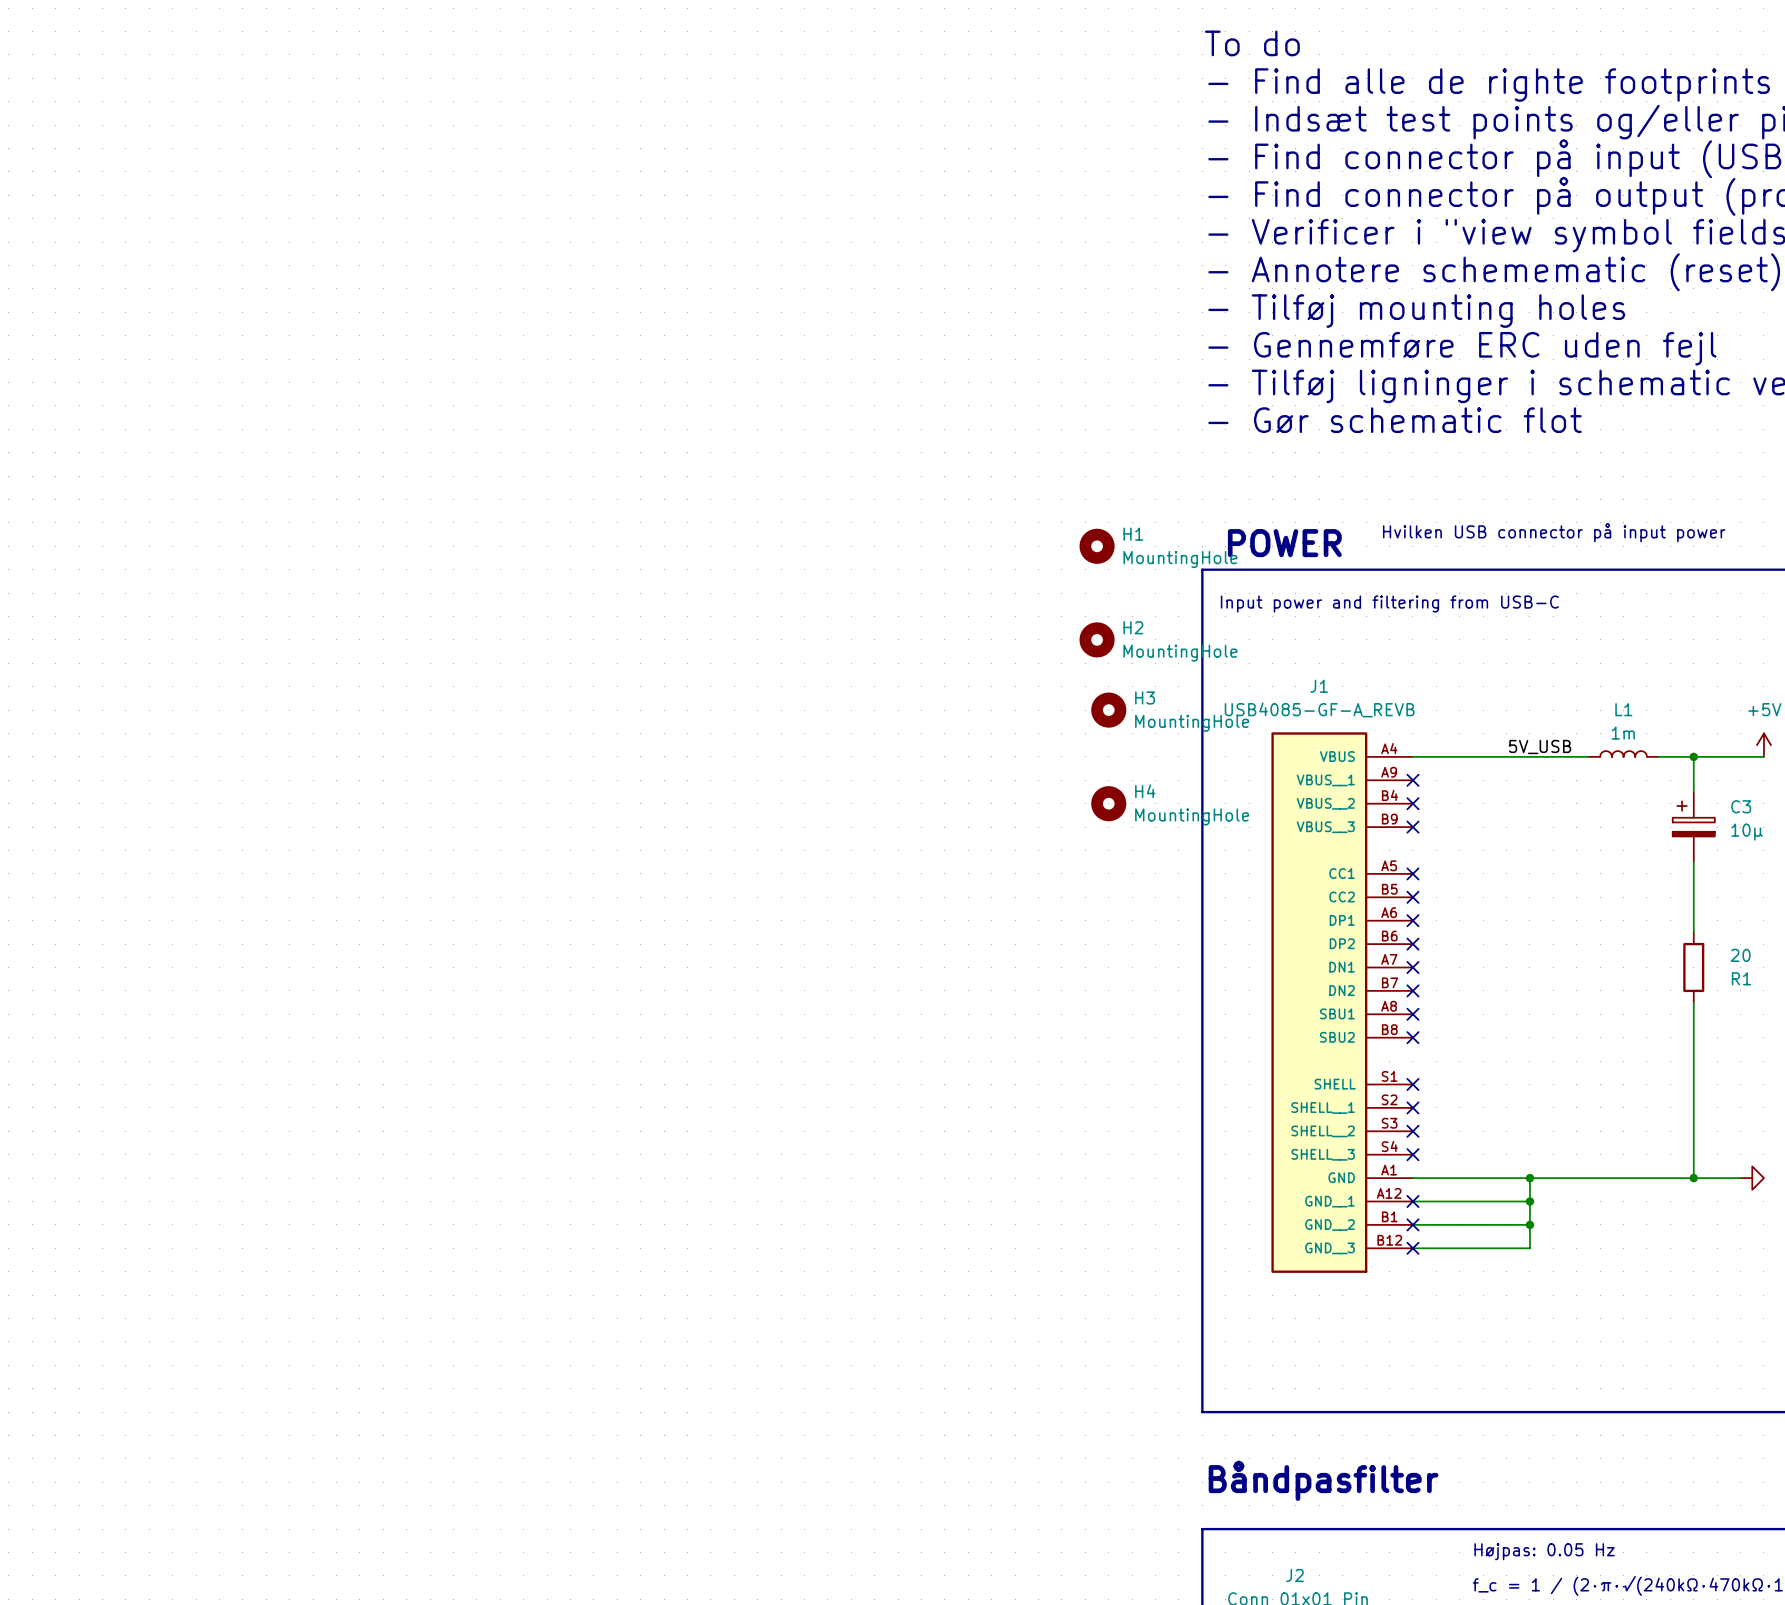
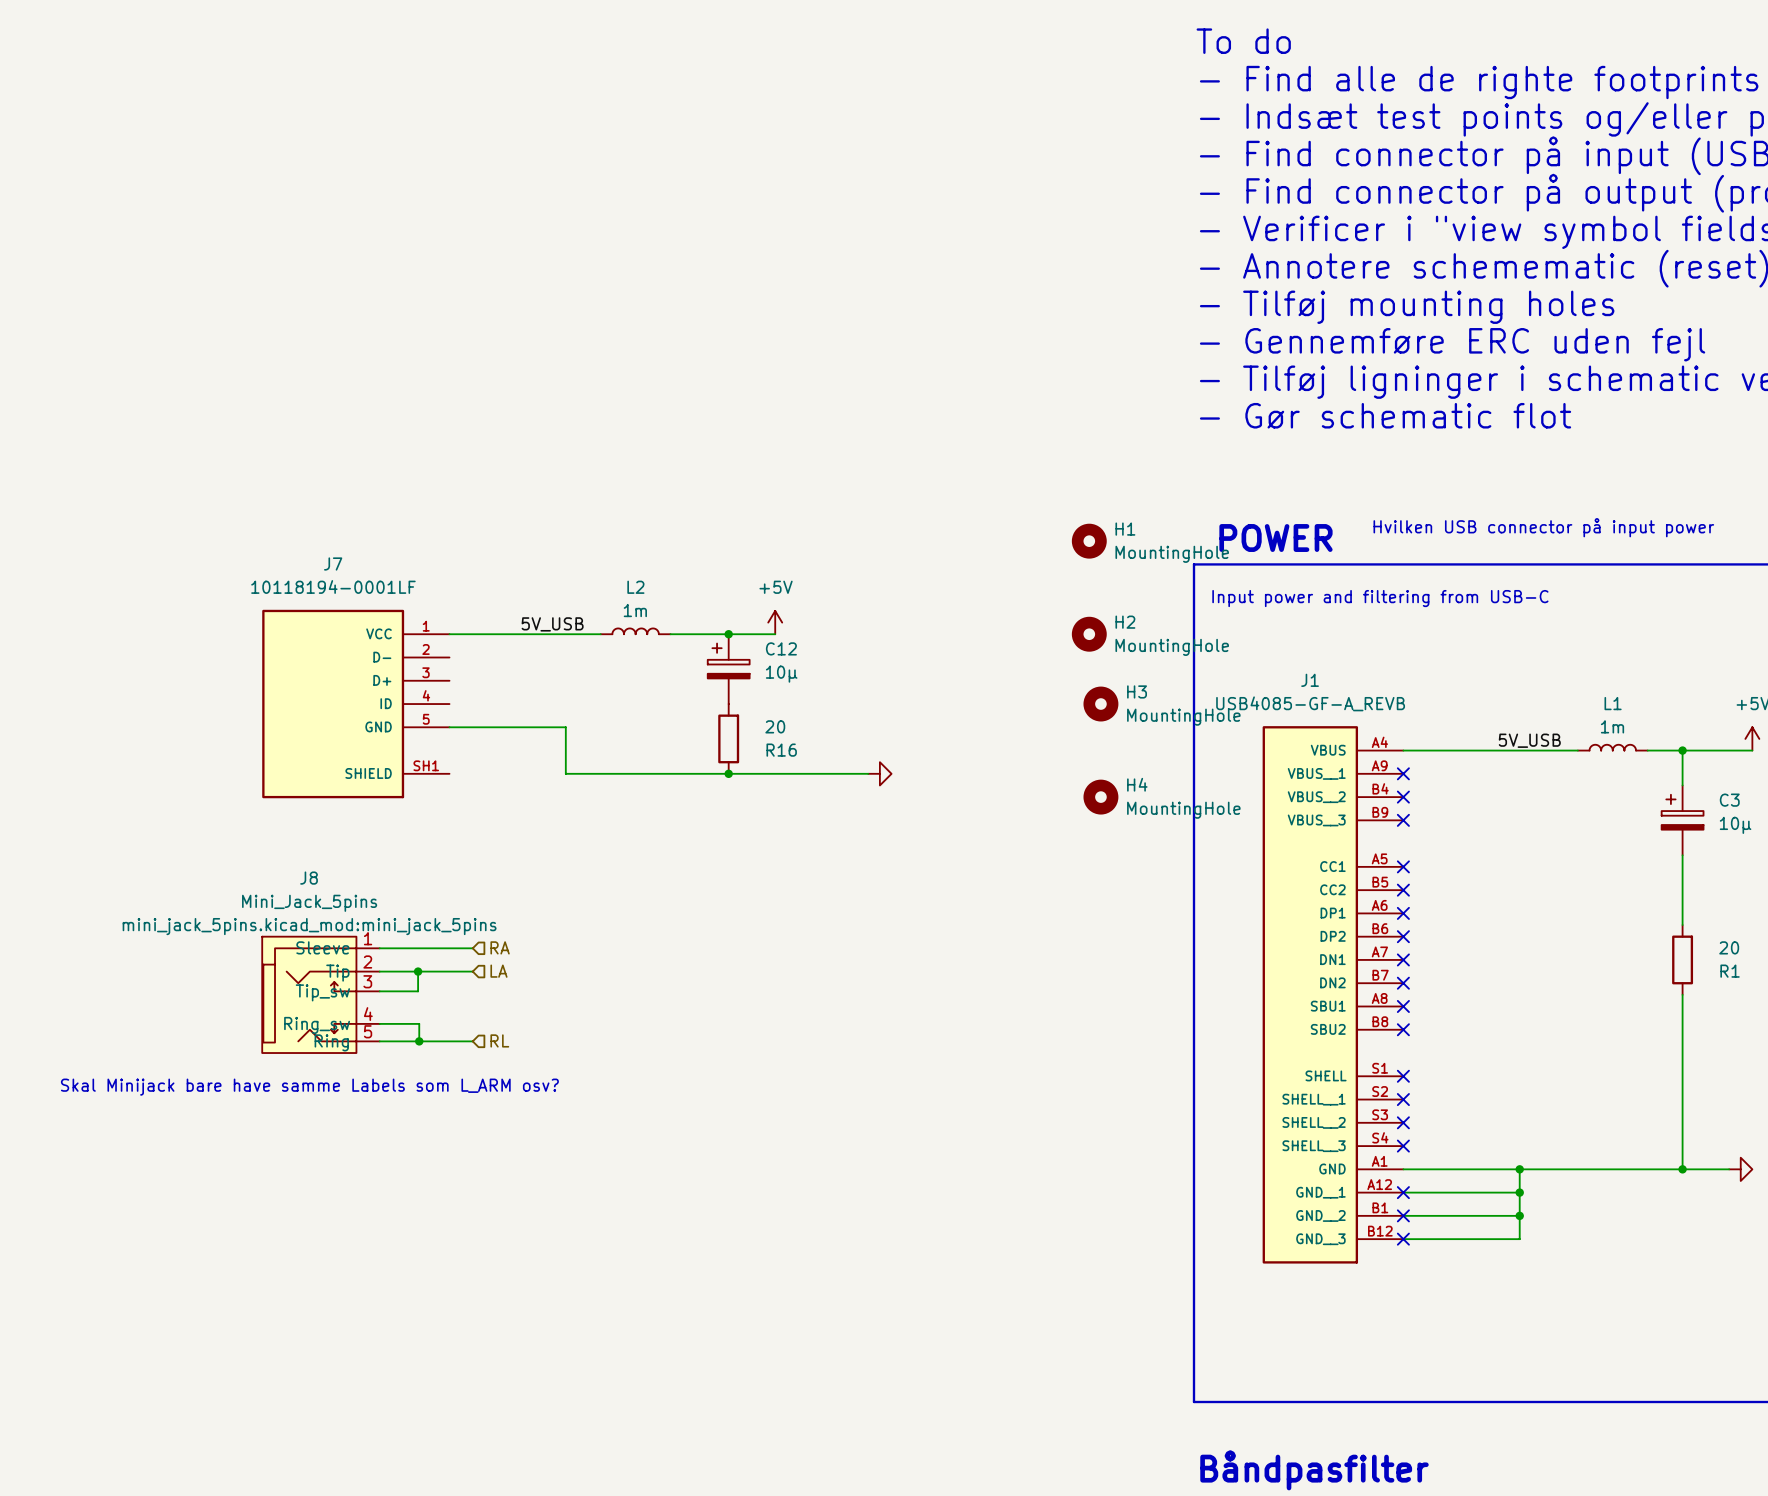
power symbol: none -> +5V (775, 622)
label: none -> 5V_USB (552, 624)
L2: none -> 1m (635, 631)
wire: none -> (449, 634) (600, 634)
wire: none -> (670, 634) (775, 634)
junction: none -> (728, 634)
C12: none -> 10μ (728, 669)
J7: none -> 10118194-0001LF (355, 704)
wire: none -> (449, 727) (565, 727) (565, 773) (868, 773)
R16: none -> 20 (728, 738)
junction: none -> (728, 773)
power symbol: none -> (879, 773)
wire: none -> (379, 948) (472, 948)
hierarchical label: none -> RA (500, 947)
hierarchical label: none -> LA (498, 971)
wire: none -> (379, 971) (472, 971)
wire: none -> (418, 971) (418, 991) (379, 991)
junction: none -> (418, 971)
J8: none -> Mini_Jack_5pins (320, 994)
wire: none -> (379, 1023) (419, 1023) (419, 1041)
hierarchical label: none -> RL (499, 1040)
wire: none -> (379, 1041) (472, 1041)
junction: none -> (419, 1041)
text: none -> Skal Minijack bare have samme Labels som L_ARM osv? (309, 1087)

